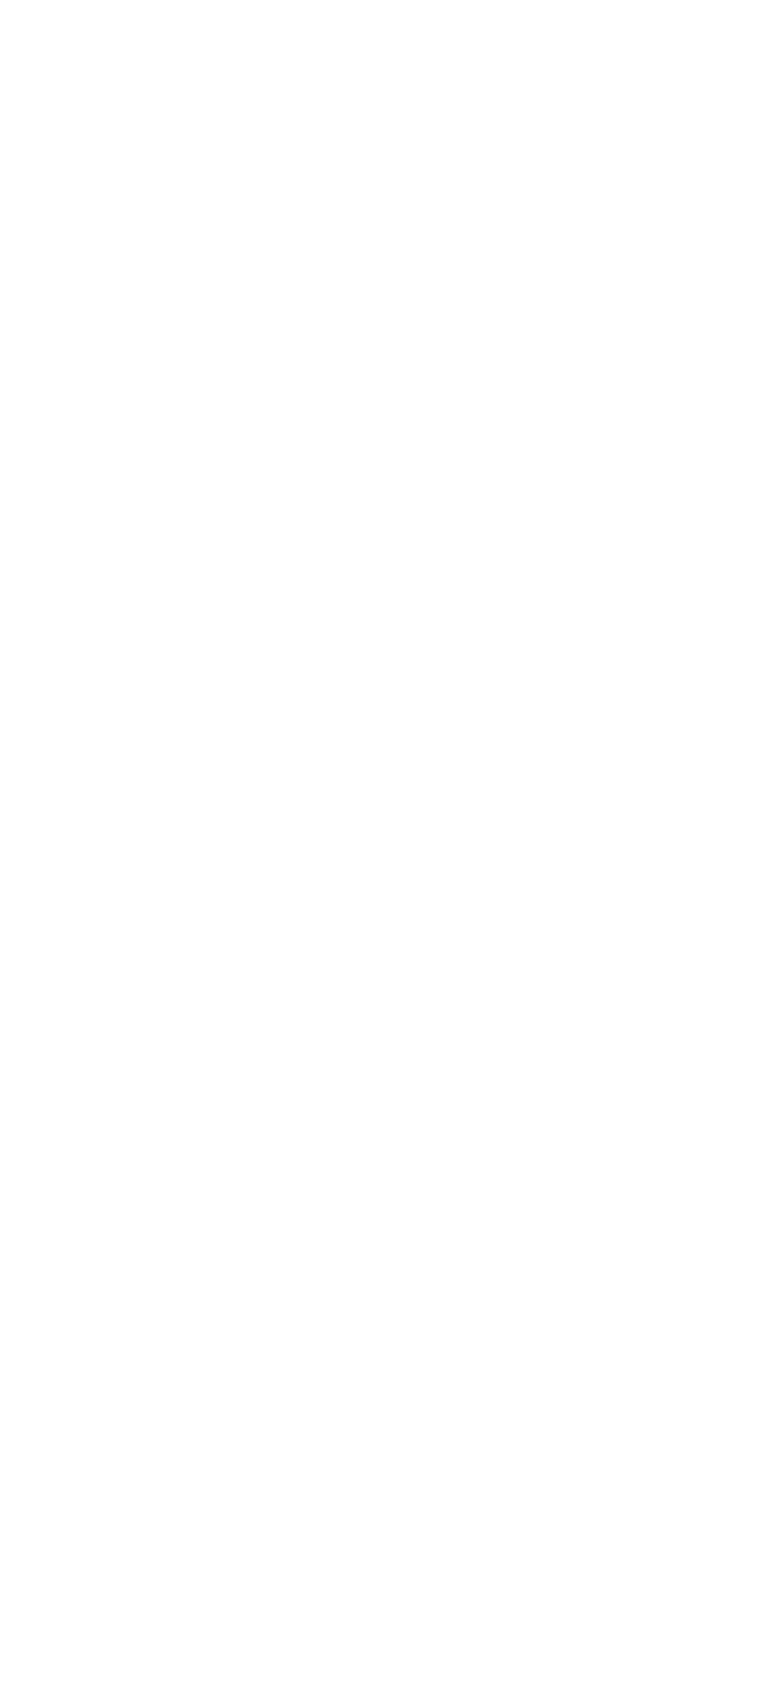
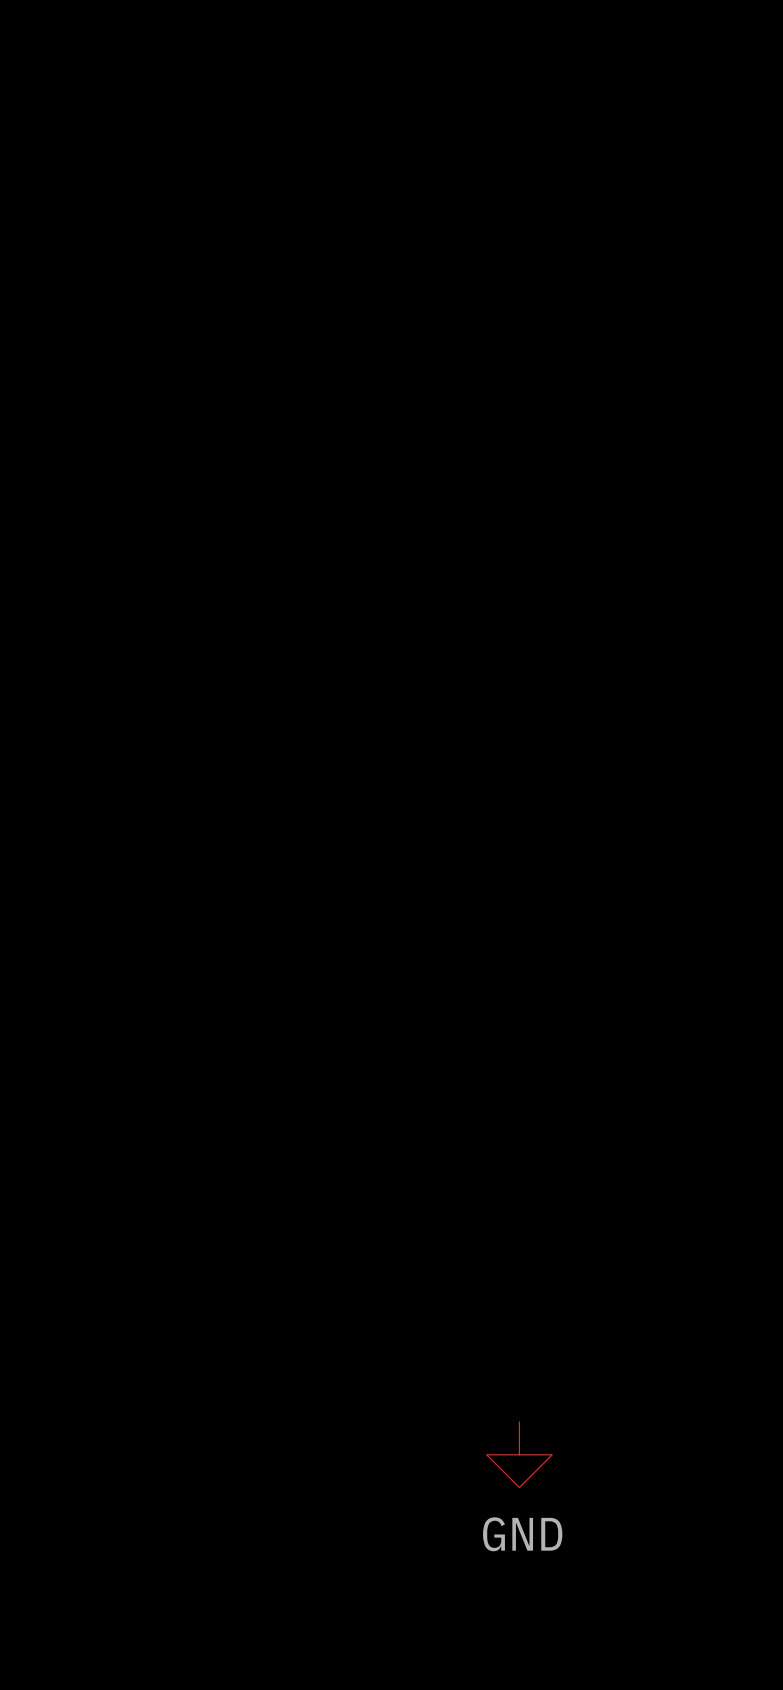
power symbol: none -> GND (519, 1454)

